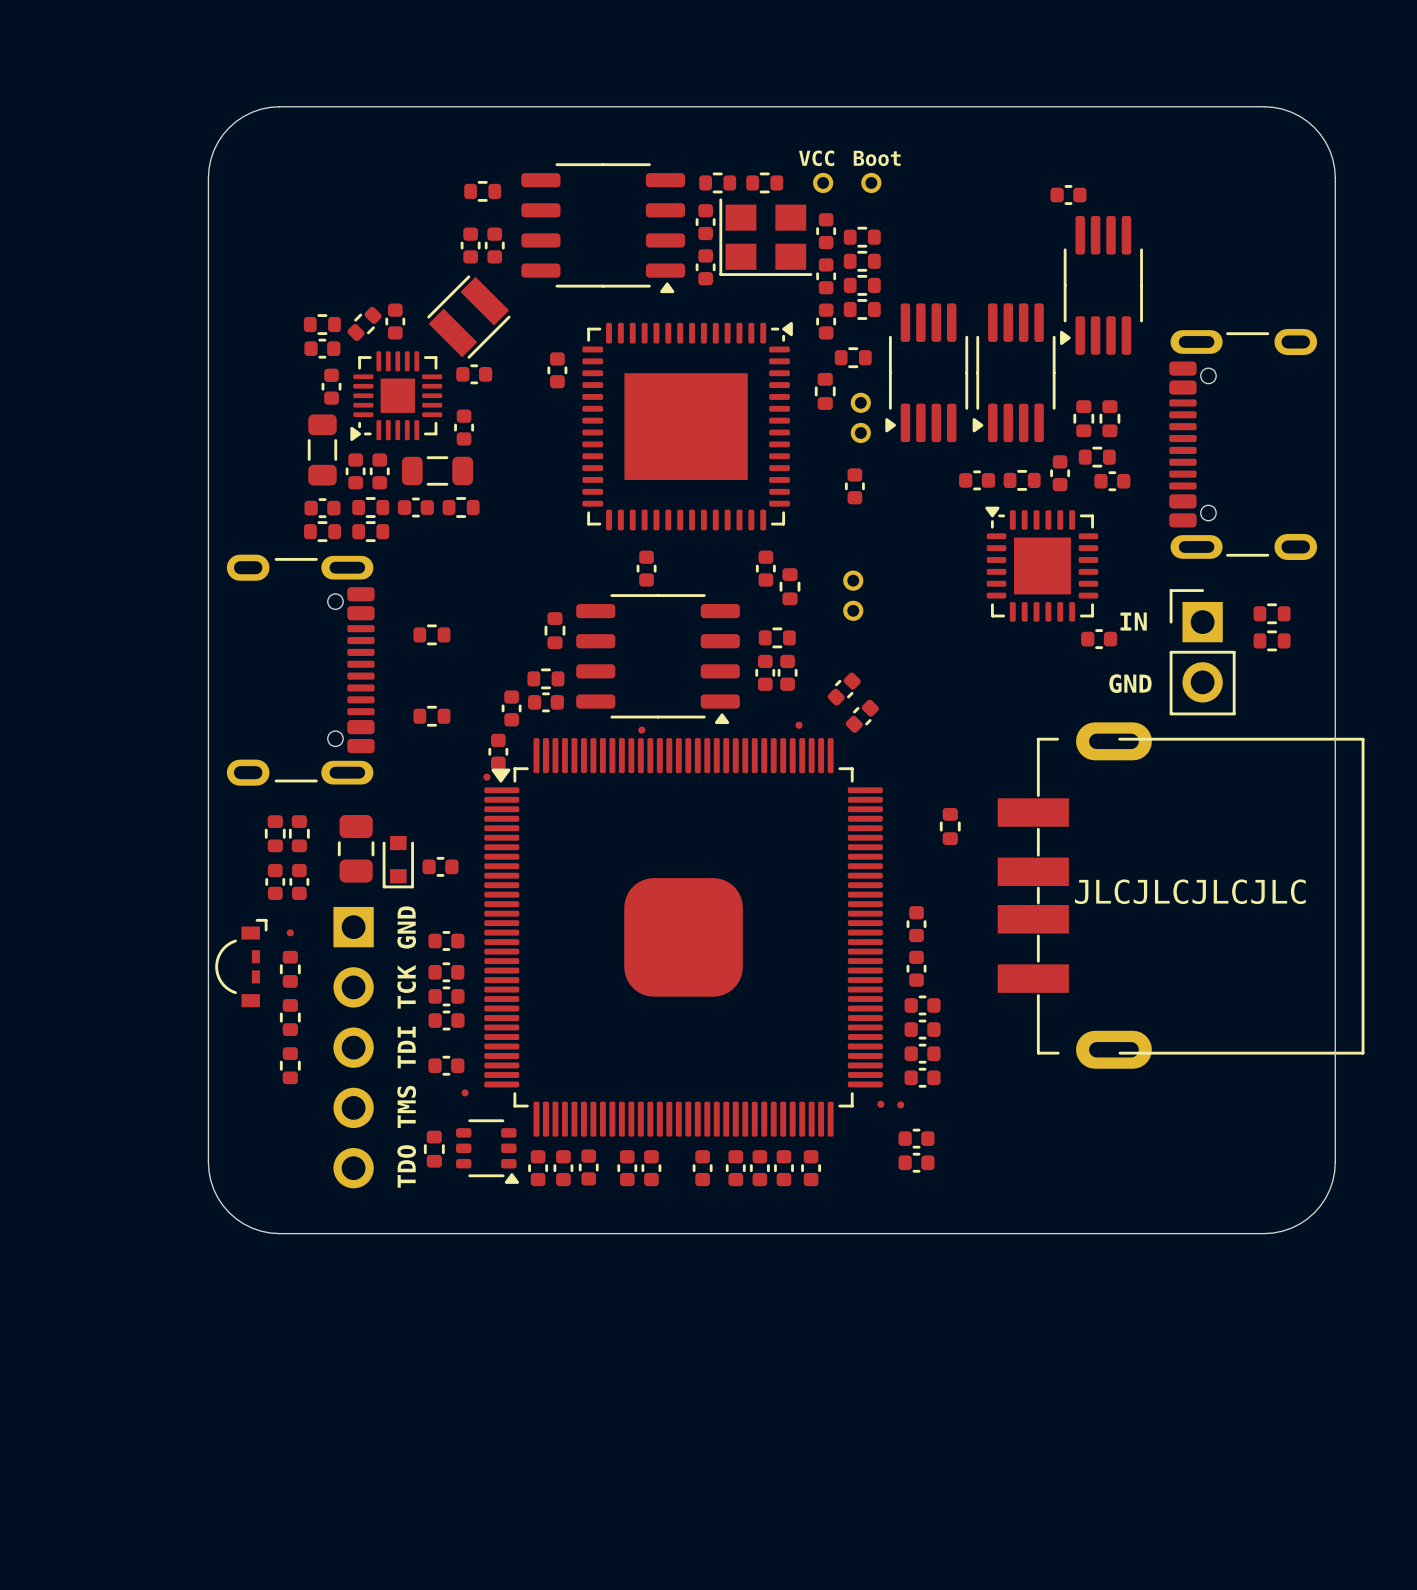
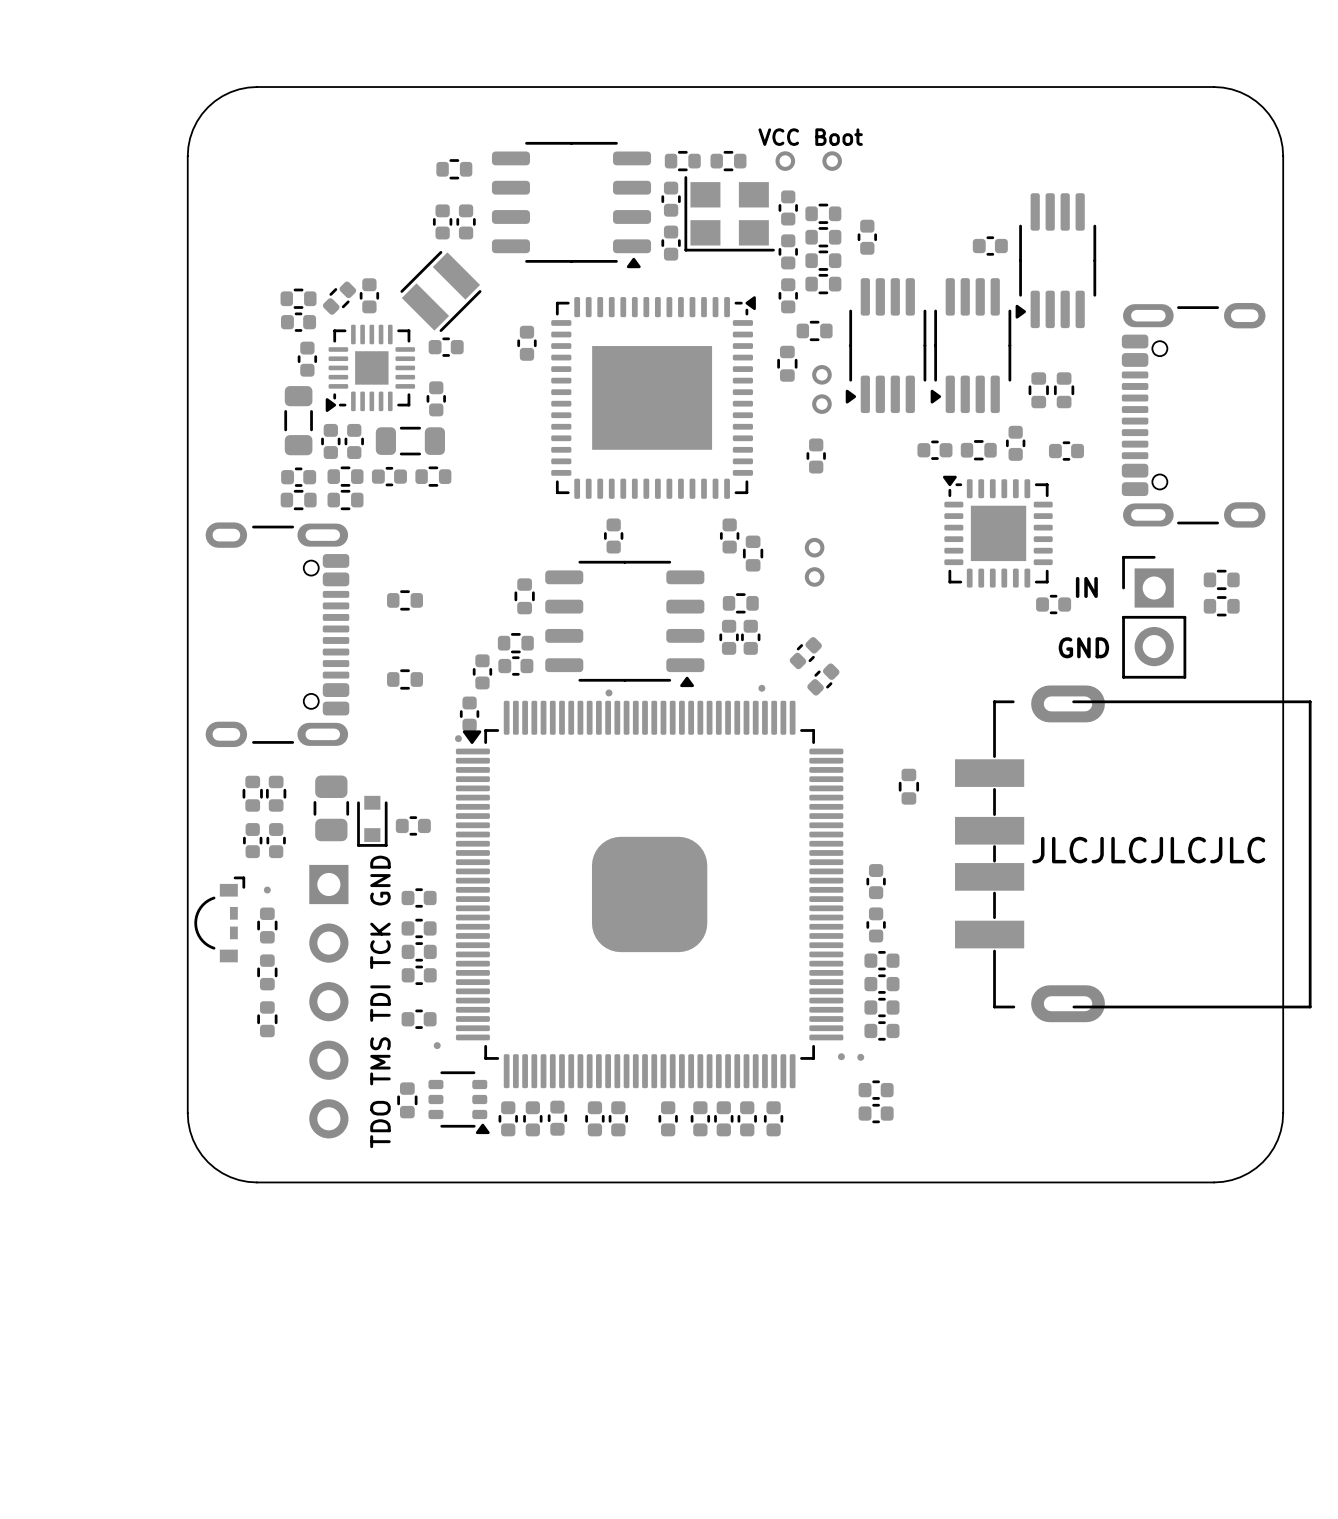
part position: (1068, 195) -> (990, 246)
part: none -> (867, 237)
part: (1097, 457) -> none

